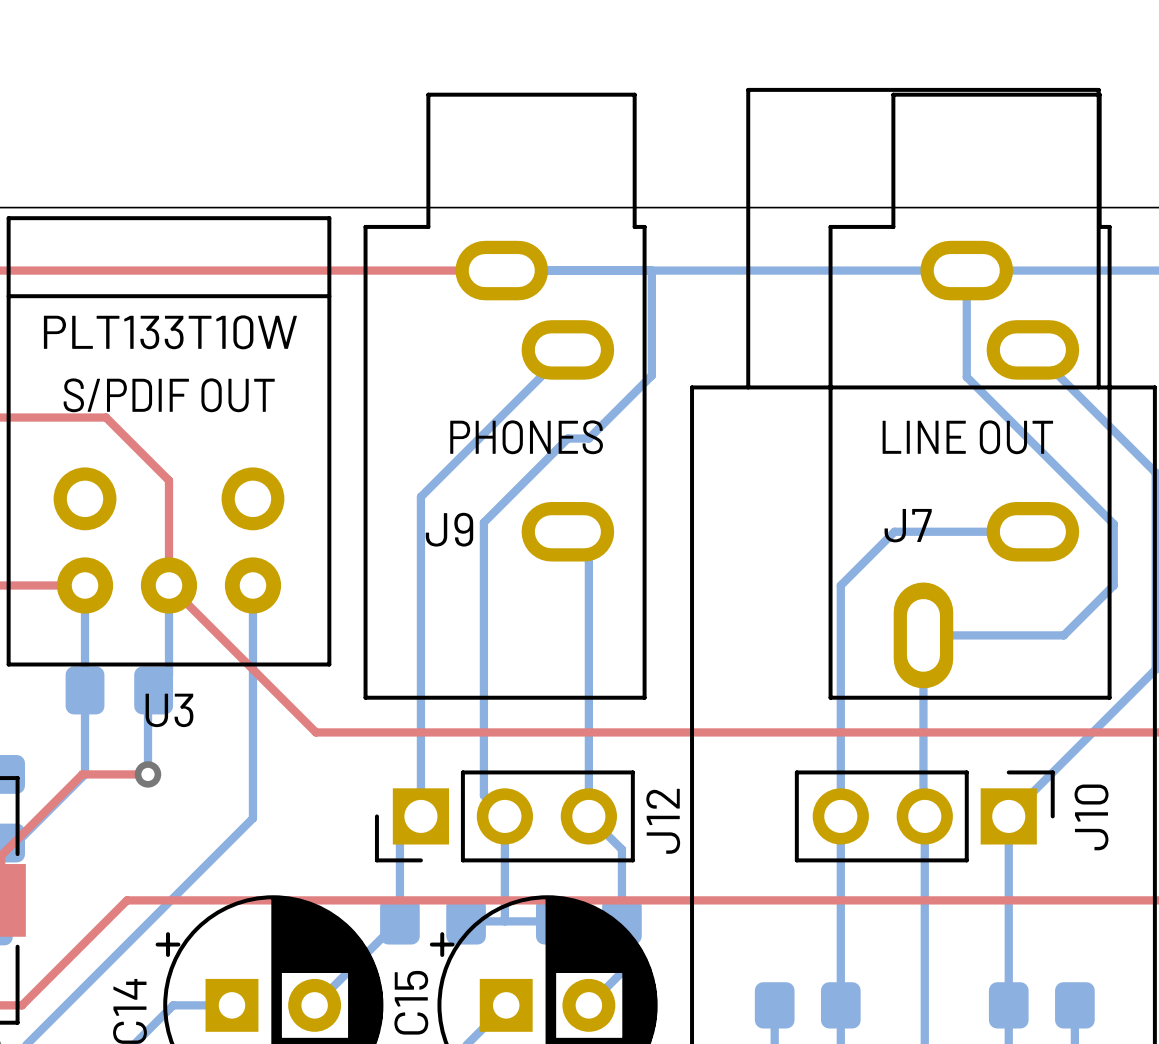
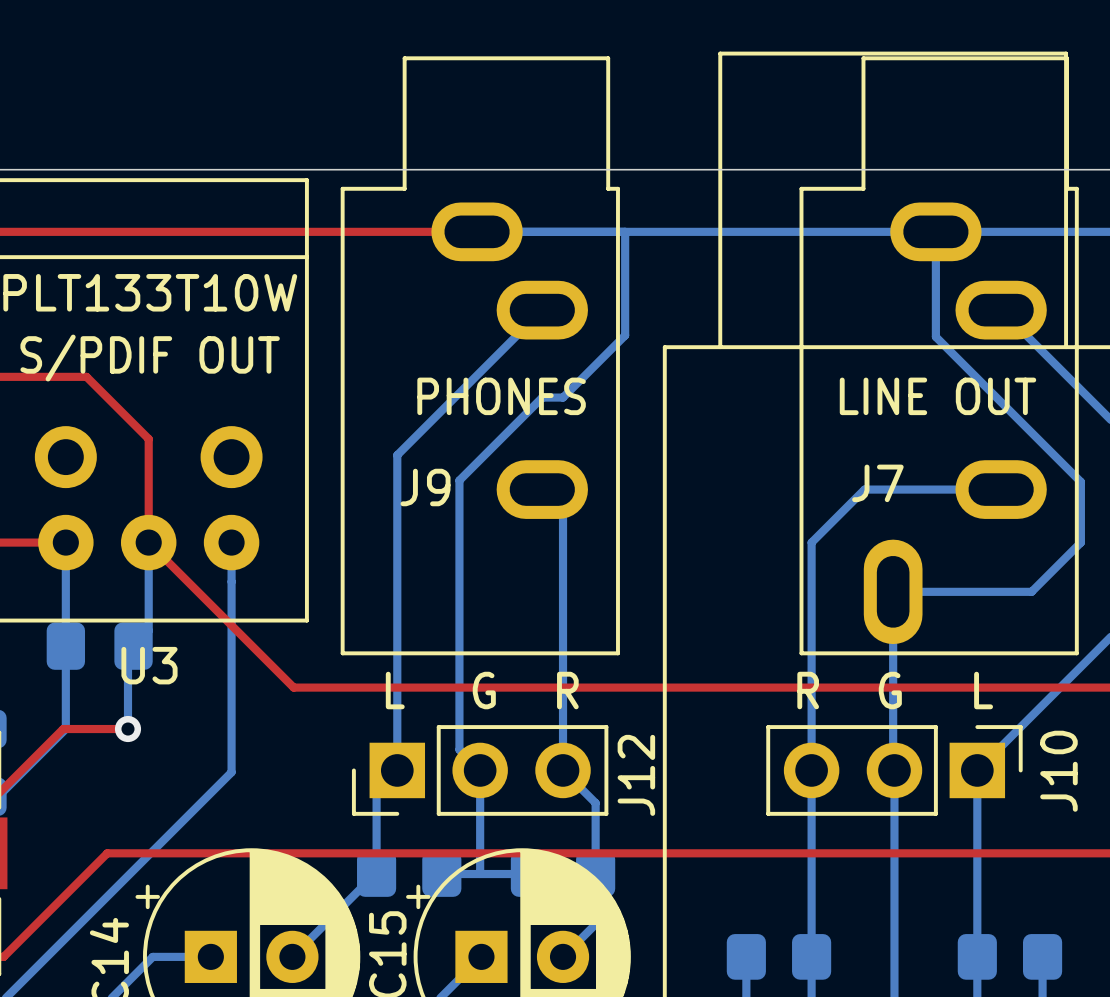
text: none -> L (395, 690)
text: none -> G (484, 690)
text: none -> R (567, 690)
text: none -> R (808, 690)
text: none -> G (890, 690)
text: none -> L (983, 690)

